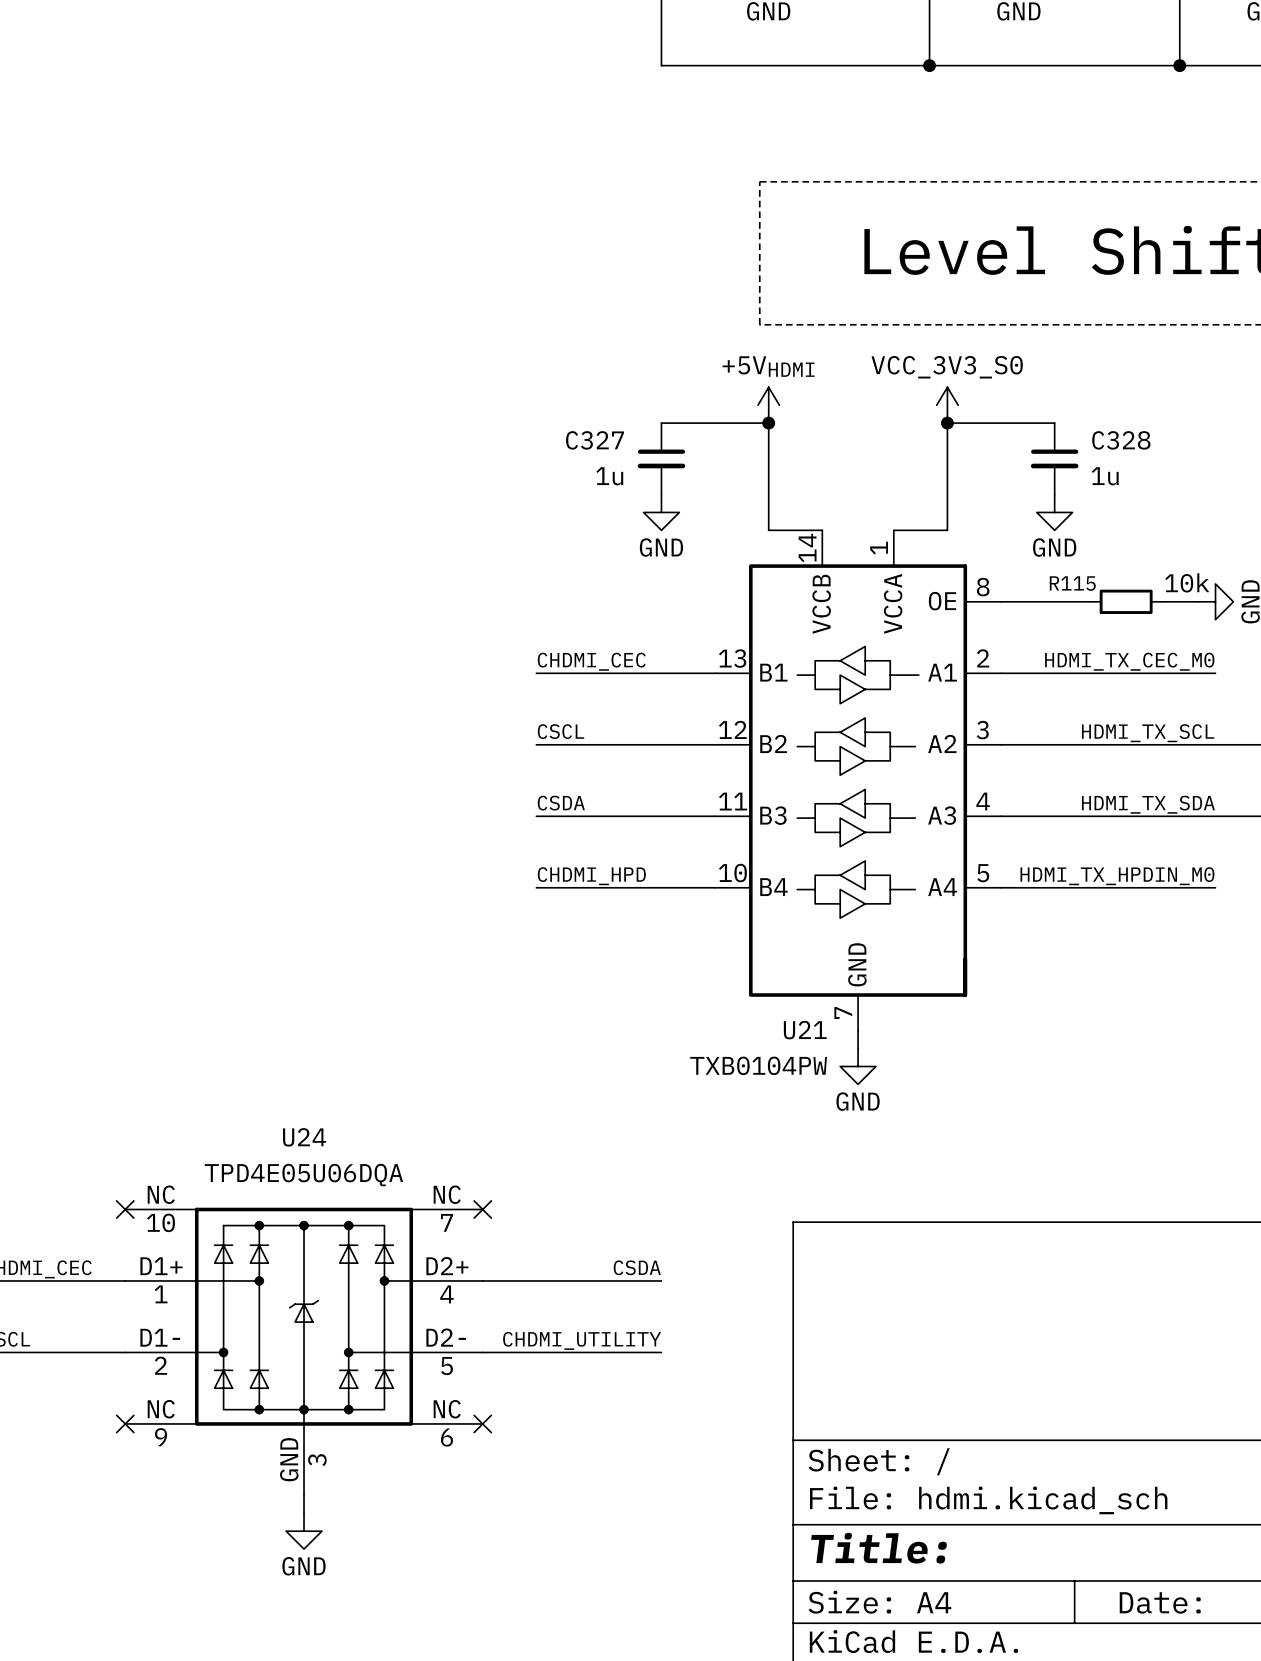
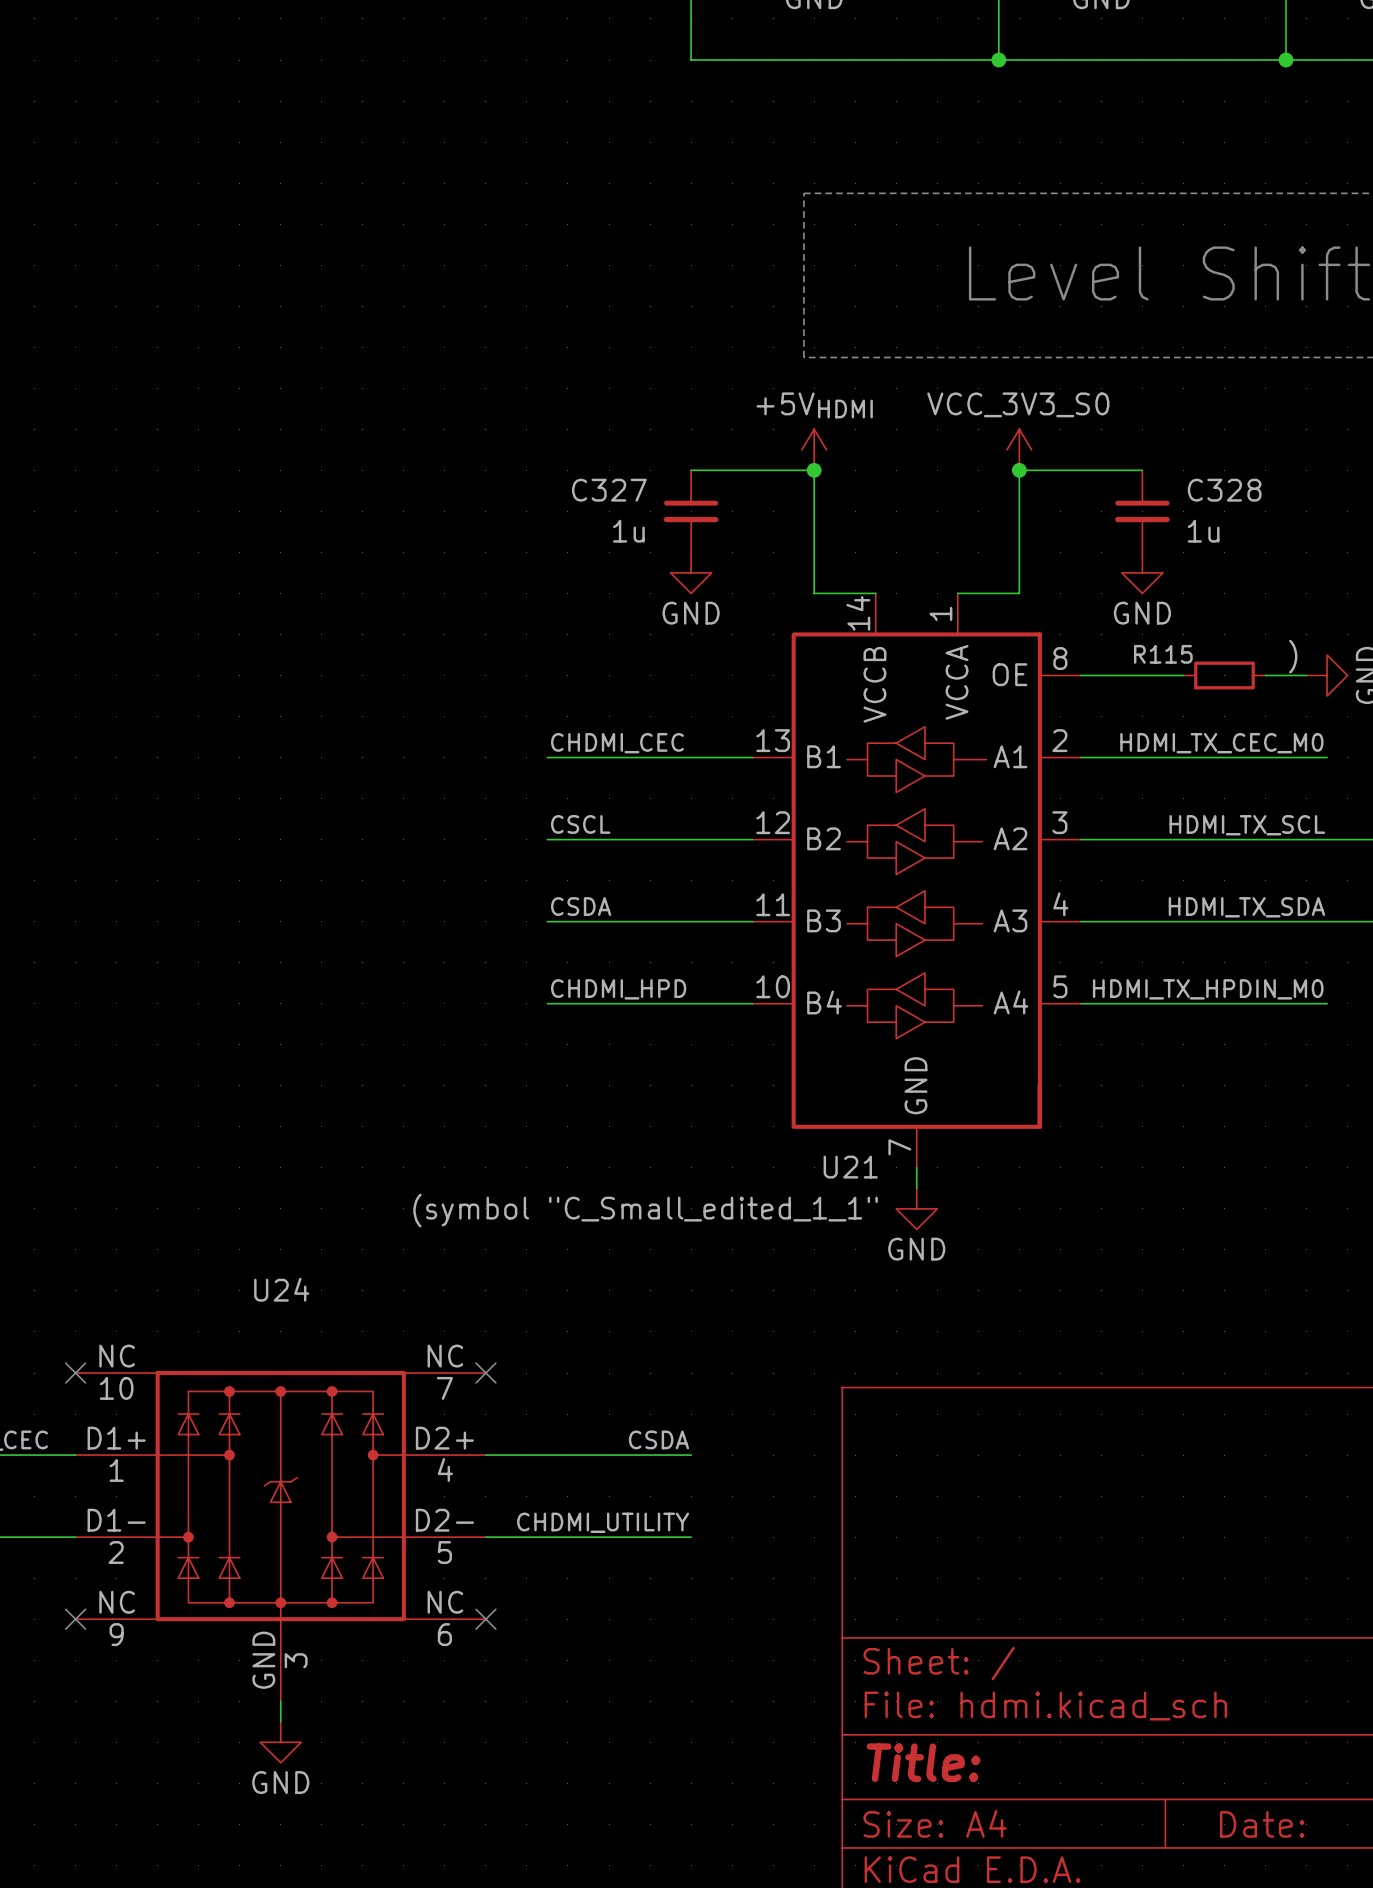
R115 value: 10k (1187, 582) -> ) (1293, 656)
U21 value: TXB0104PW (758, 1065) -> (symbol "C_Small_edited_1_1" (645, 1210)
U24 value: TPD4E05U06DQA (303, 1175) -> none

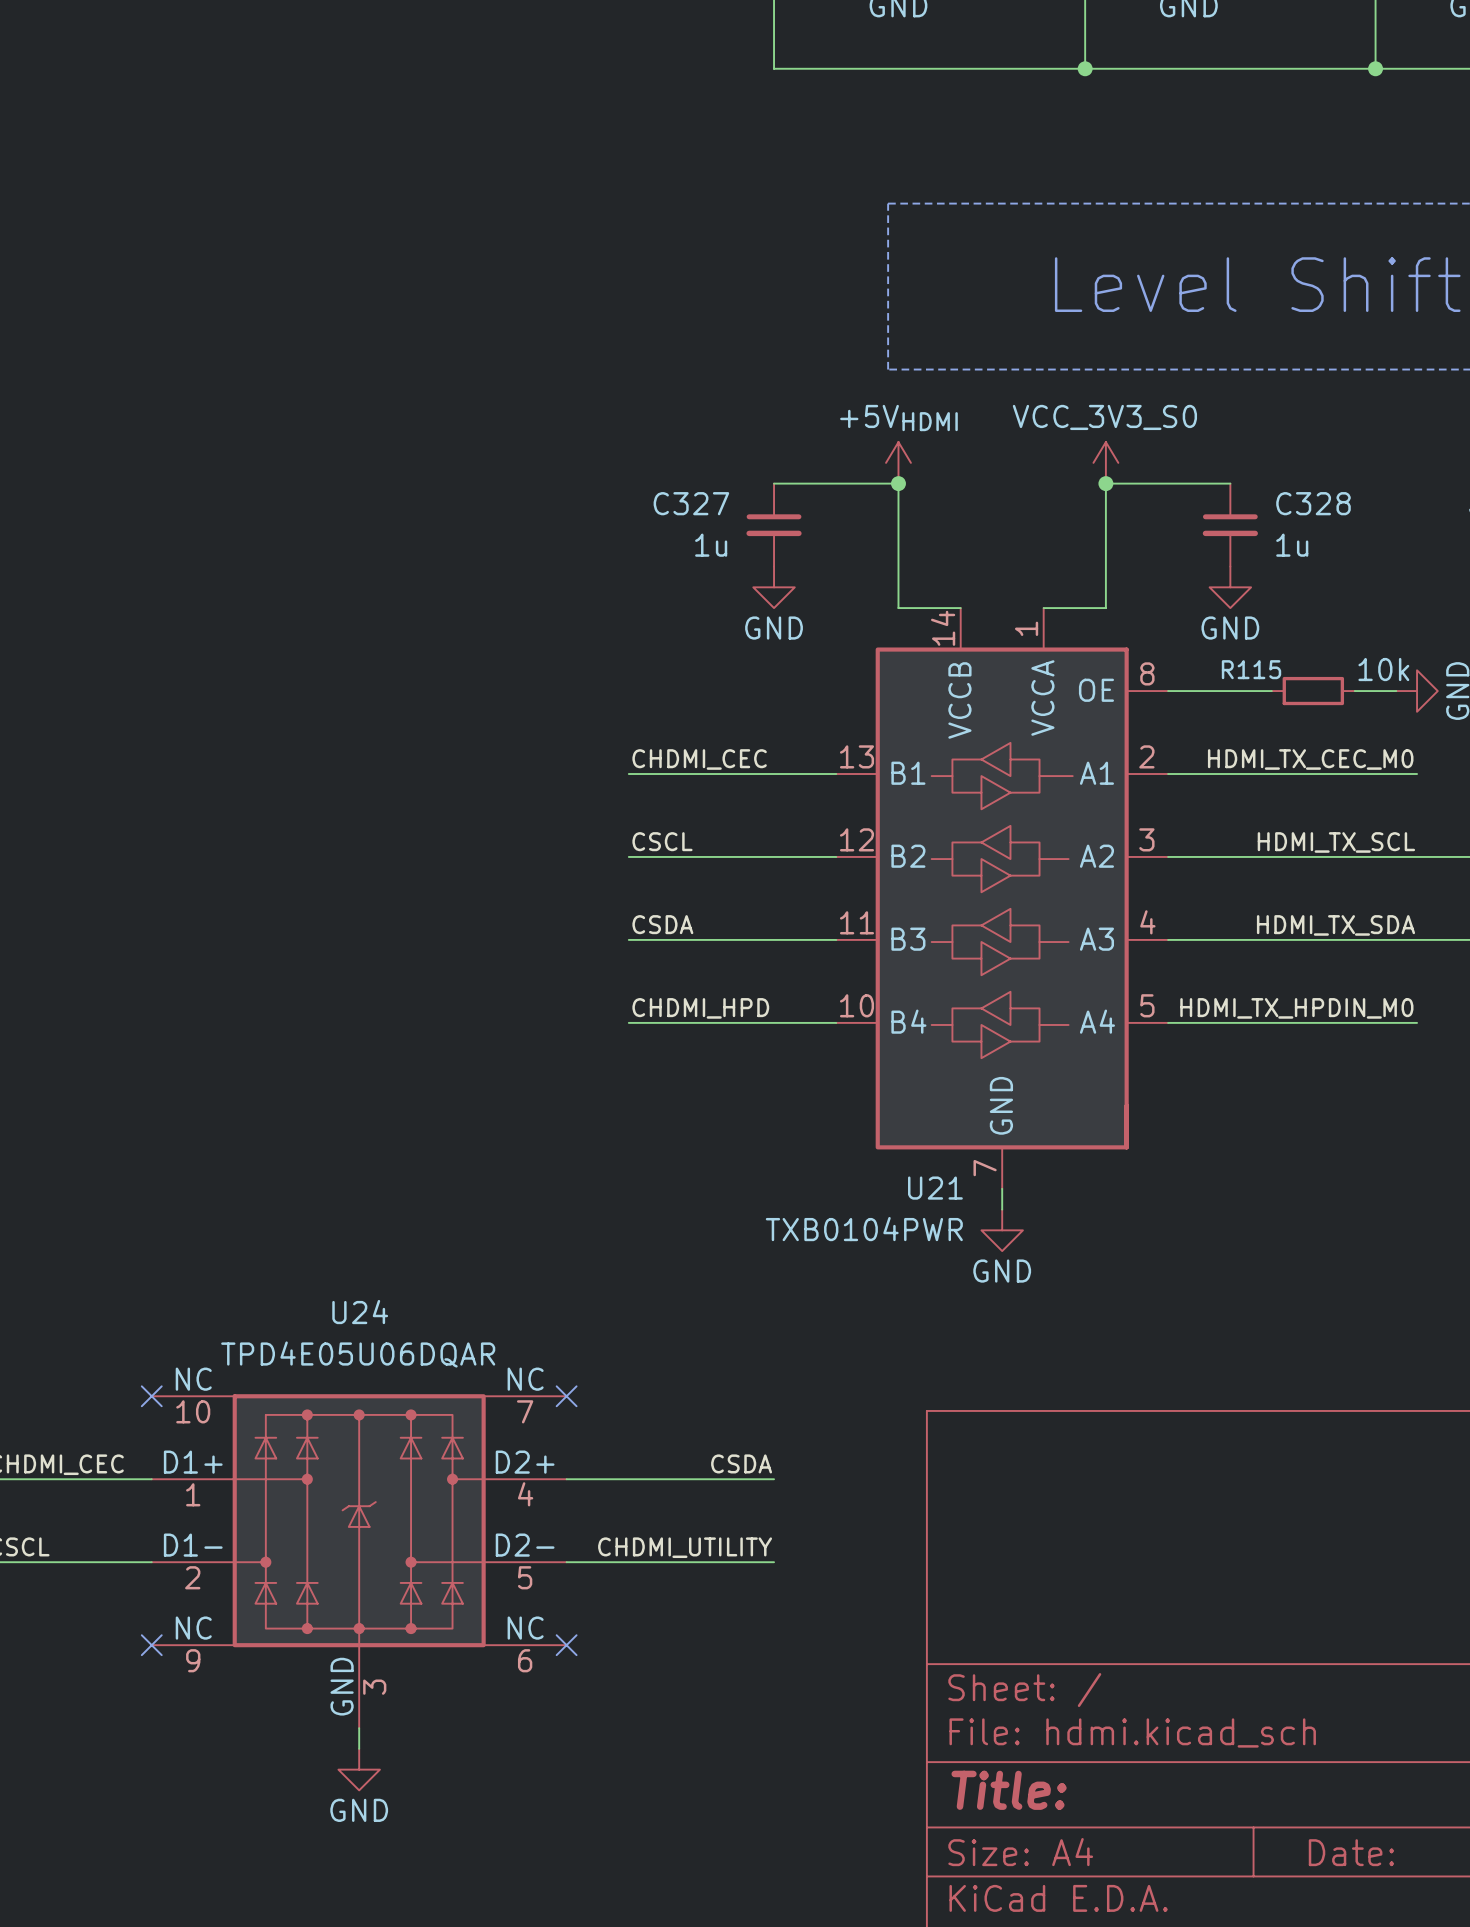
R115 value: ) (1293, 656) -> 10k (1383, 669)
U21 value: (symbol "C_Small_edited_1_1" (645, 1210) -> TXB0104PWR (864, 1229)
U24 value: none -> TPD4E05U06DQAR (358, 1354)

